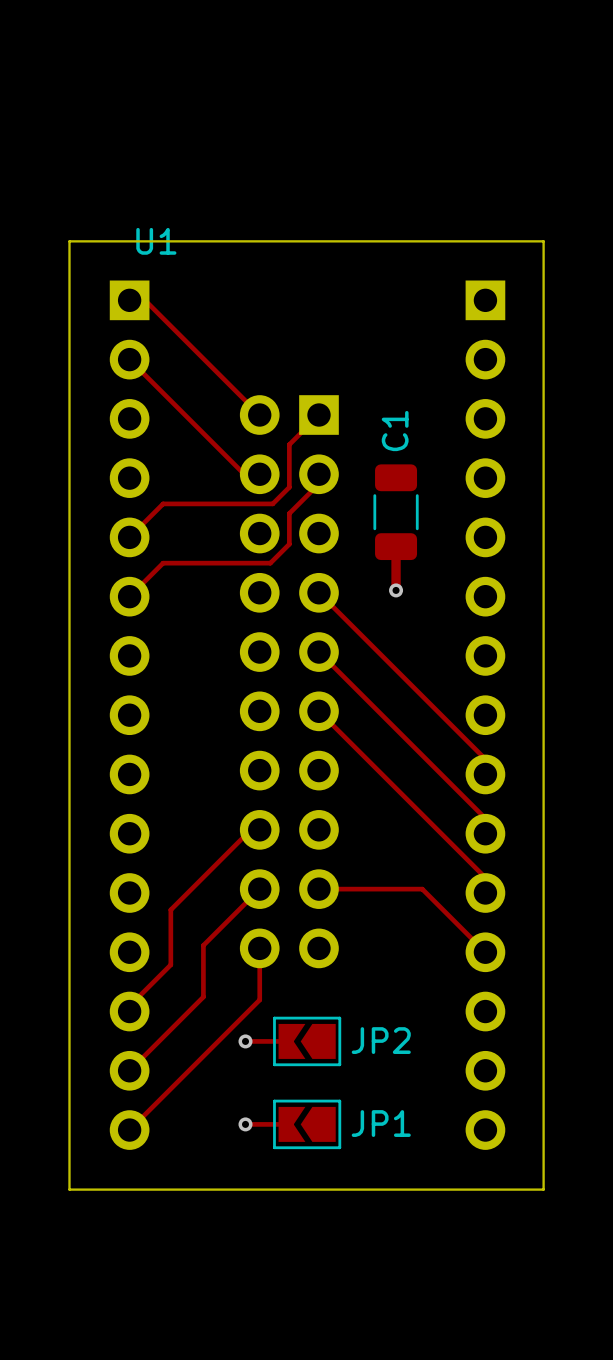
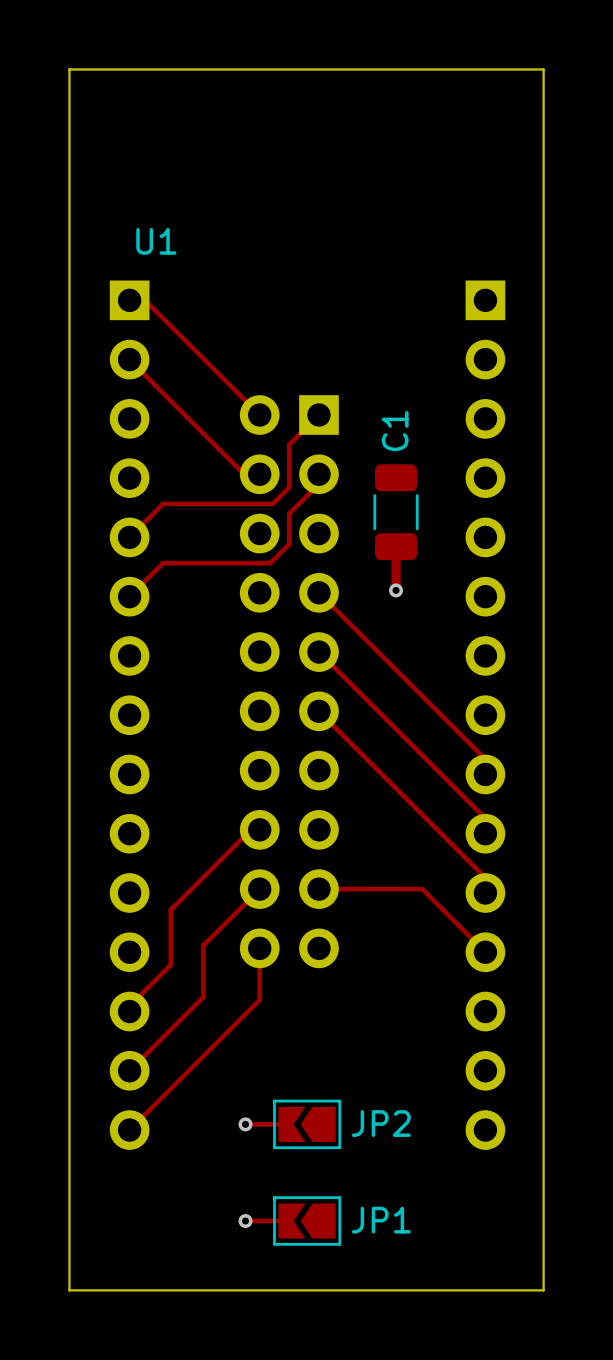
board edge: (69, 241) (543, 241) -> (69, 241) (69, 69) (543, 69) (543, 241)
track: (245, 1041) (290, 1041) -> (245, 1221) (290, 1221)
via: (245, 1041) -> none
JP2: (307, 1041) -> none
JP1 name: JP1 (381, 1123) -> JP2 (381, 1123)
board edge: (69, 1189) (543, 1189) -> (69, 1189) (69, 1290) (543, 1290) (543, 1189)
via: none -> (245, 1221)
JP1: none -> (307, 1221)

